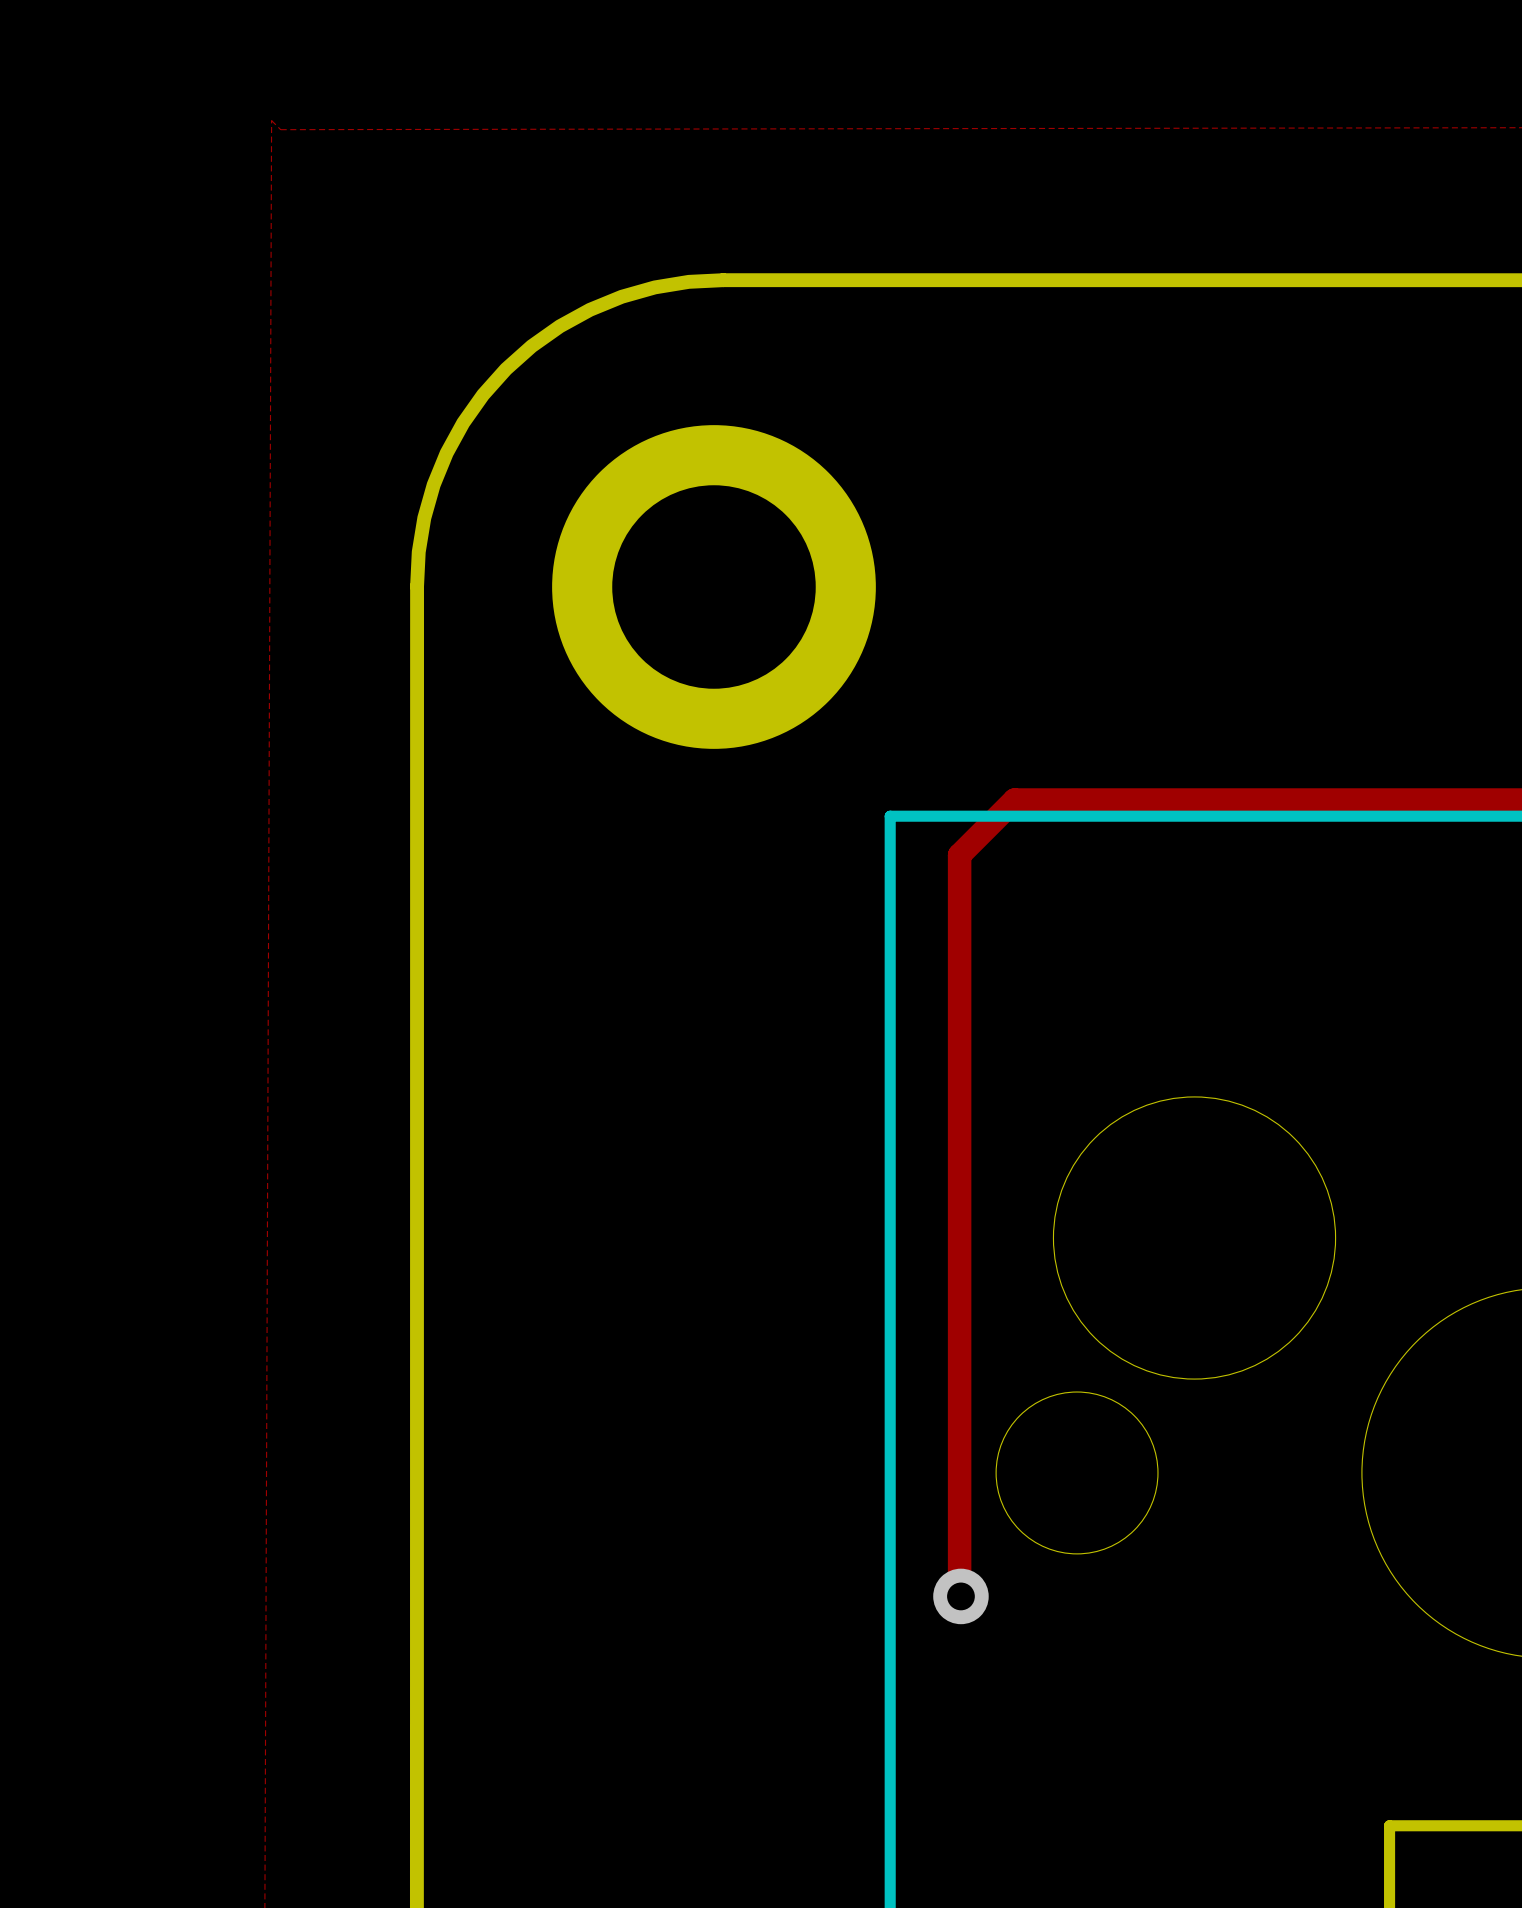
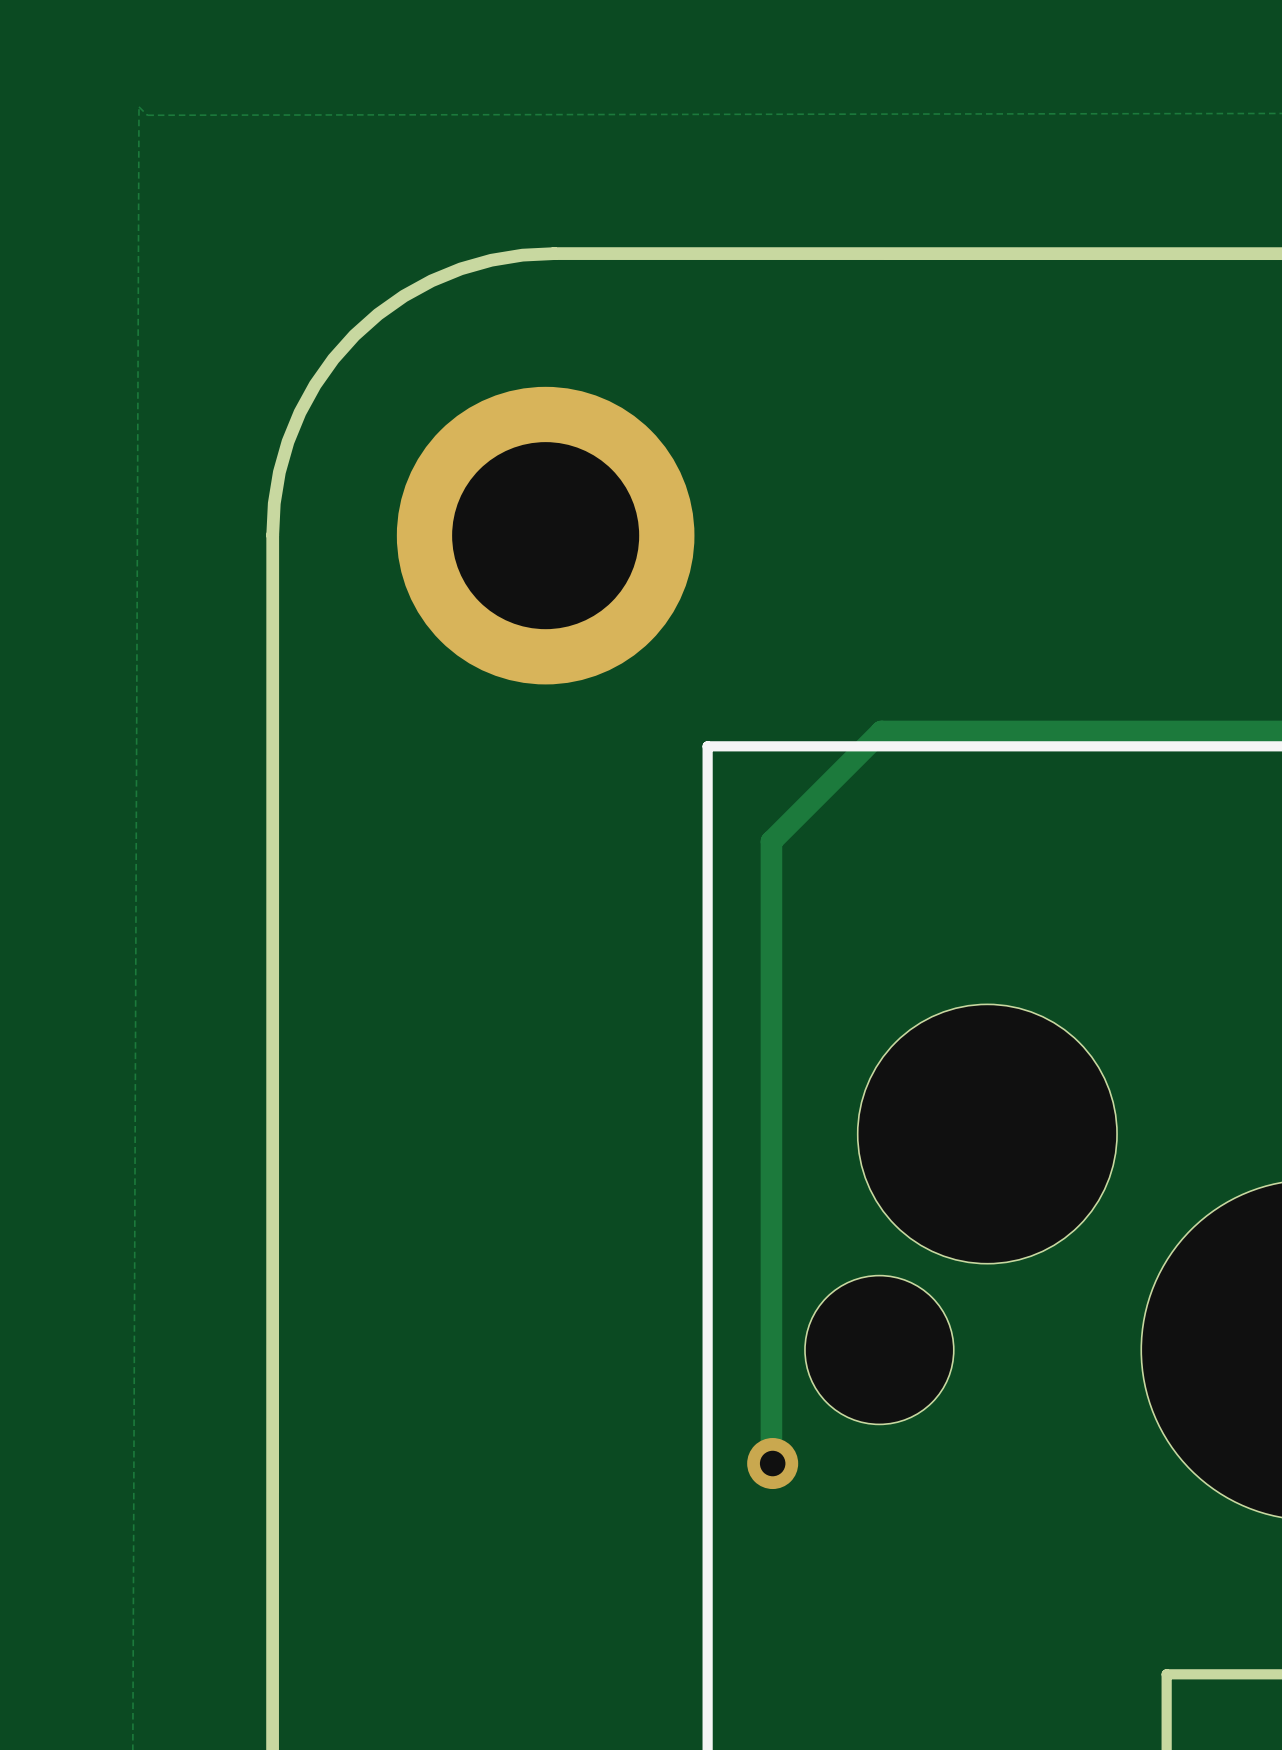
track: (1079, 800) (1014, 800) (959, 855) (959, 919) -> (881, 731) (771, 841)

